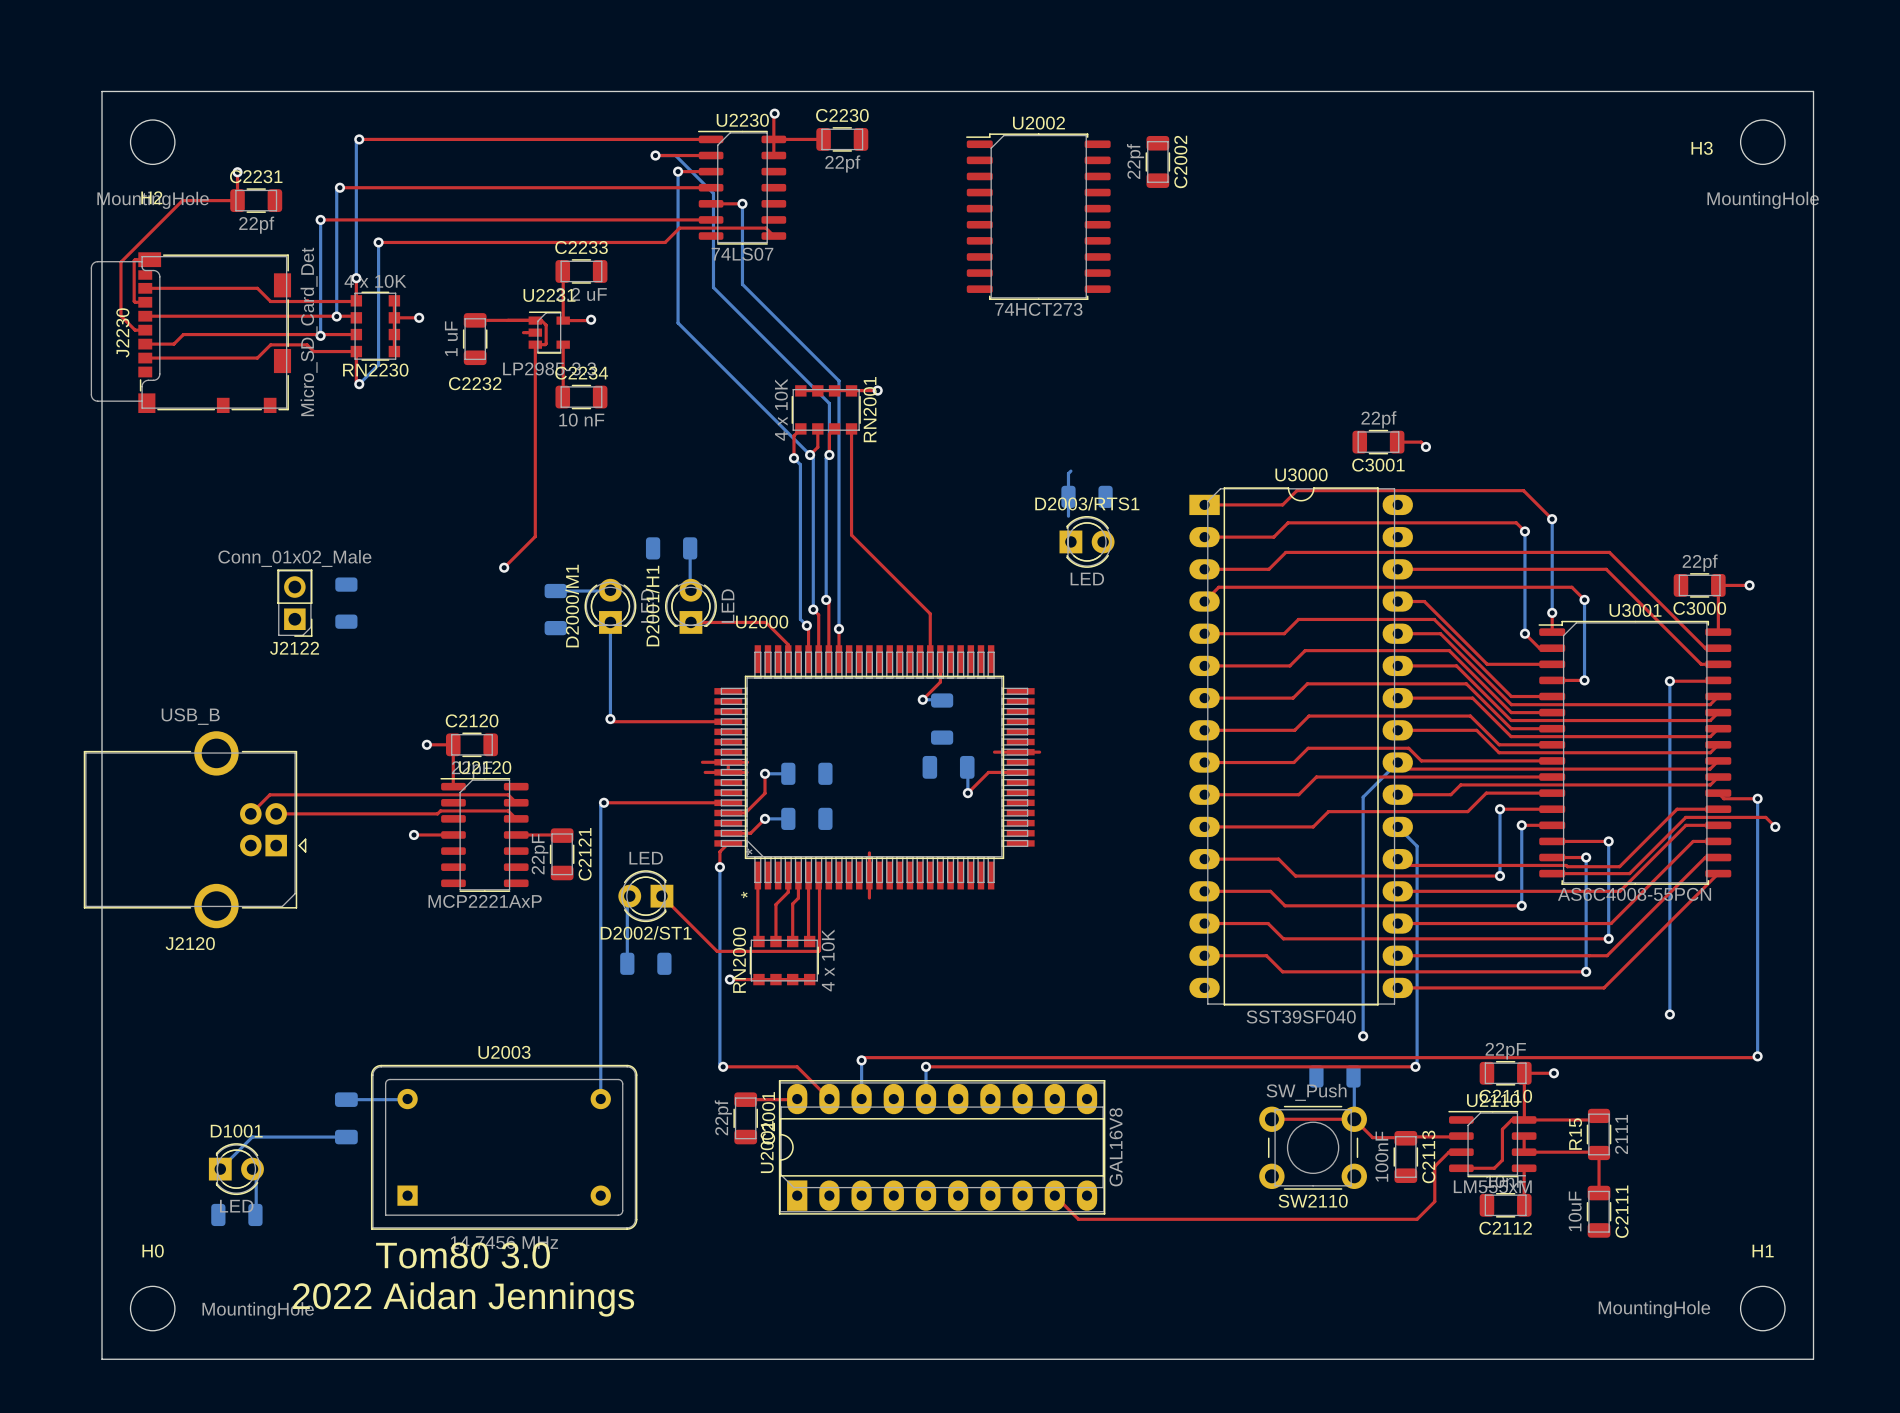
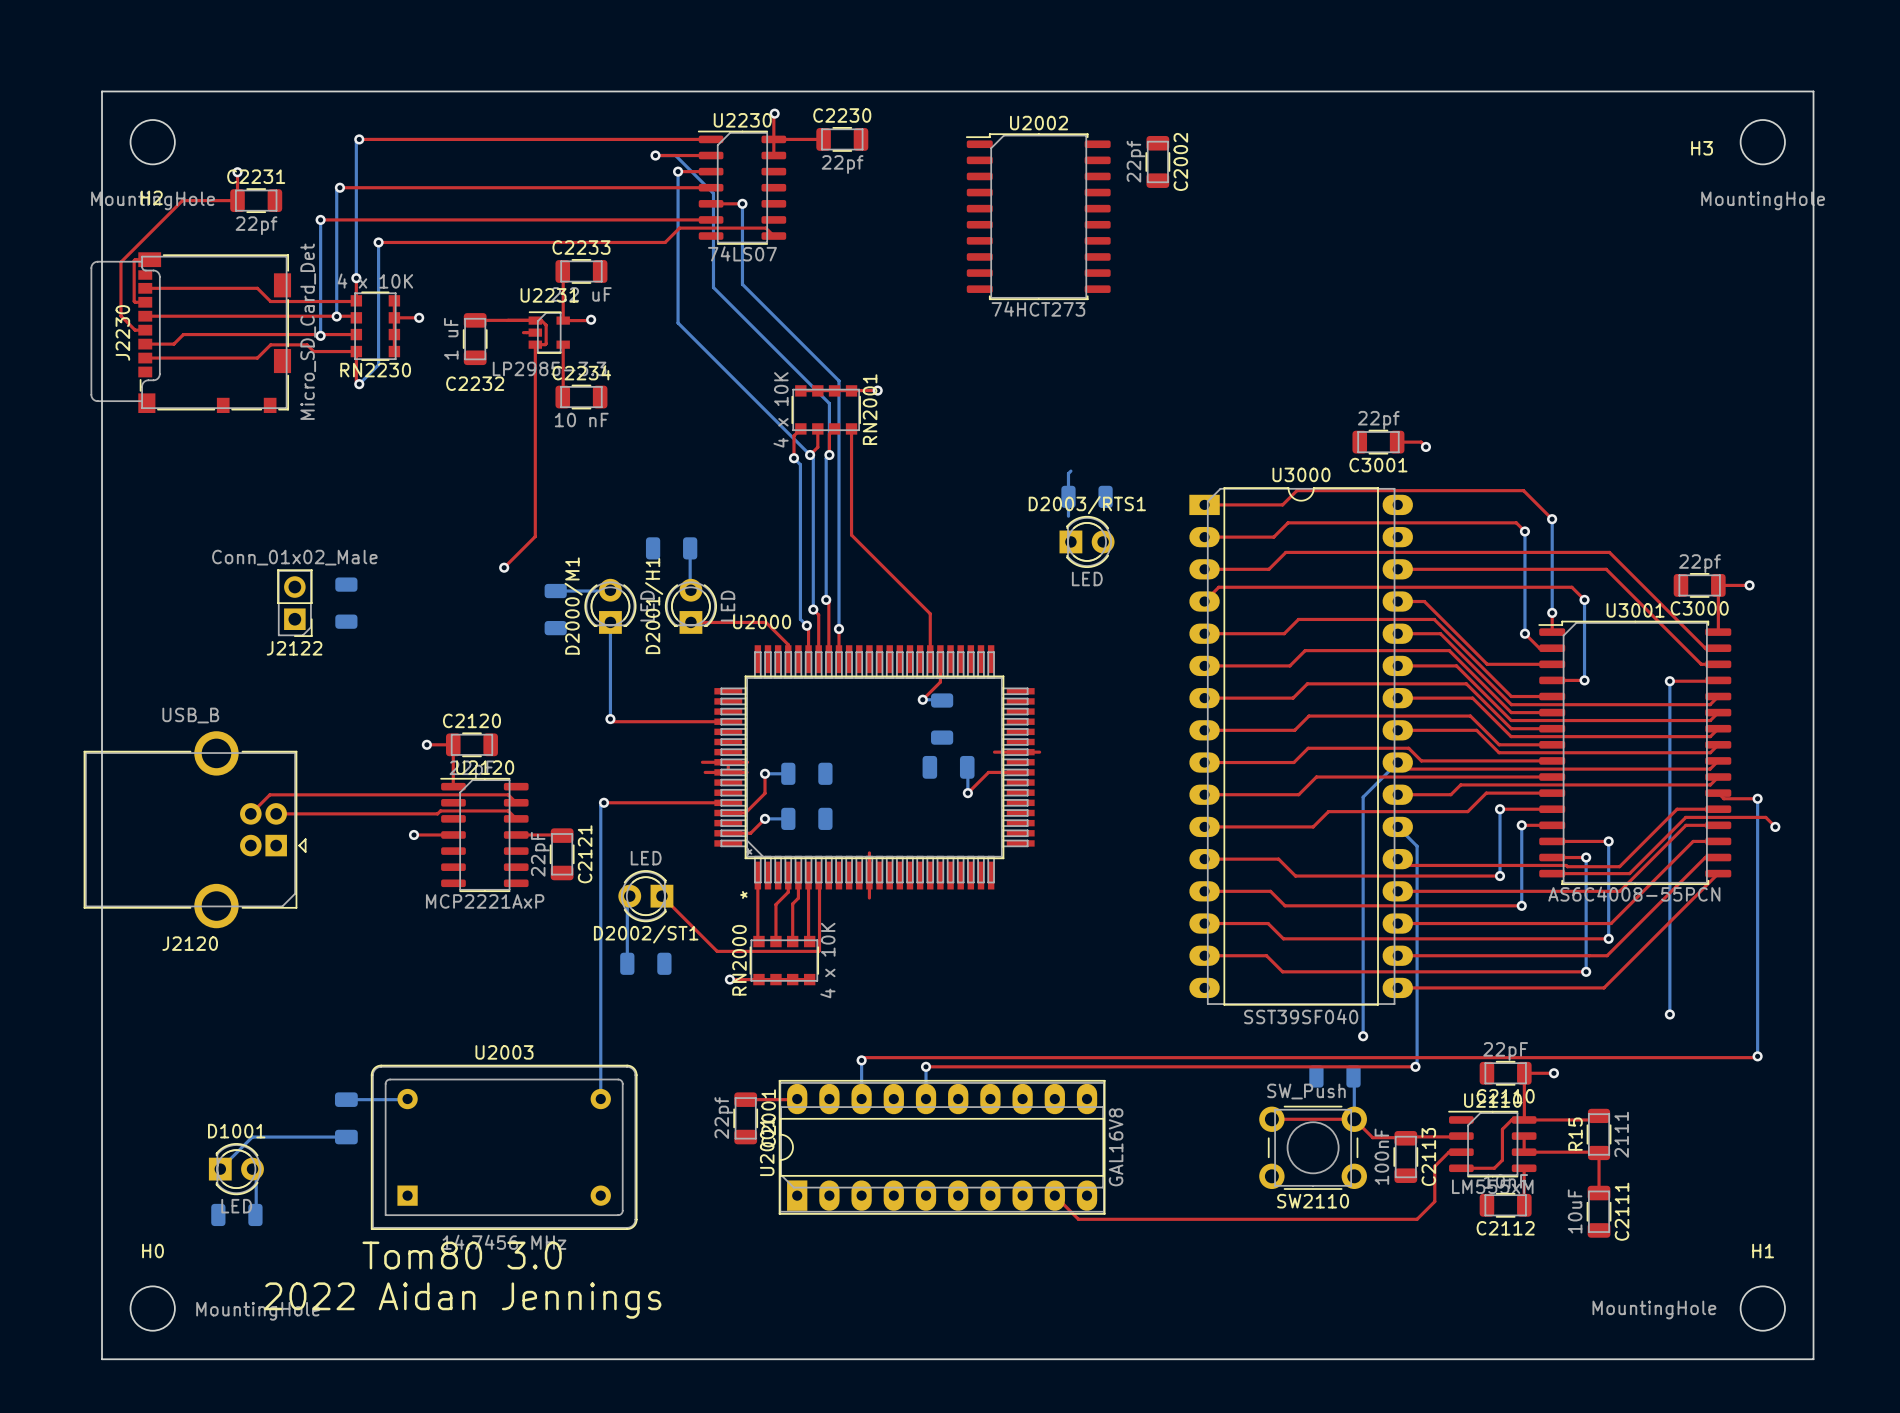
top track: (728, 843) (719, 851) (719, 867) -> none
bottom track: (719, 867) (719, 1063) (723, 1066) -> none
via: (719, 867) -> none
top track: (723, 1066) (797, 1066) (829, 1099) -> none
via: (723, 1066) -> none

